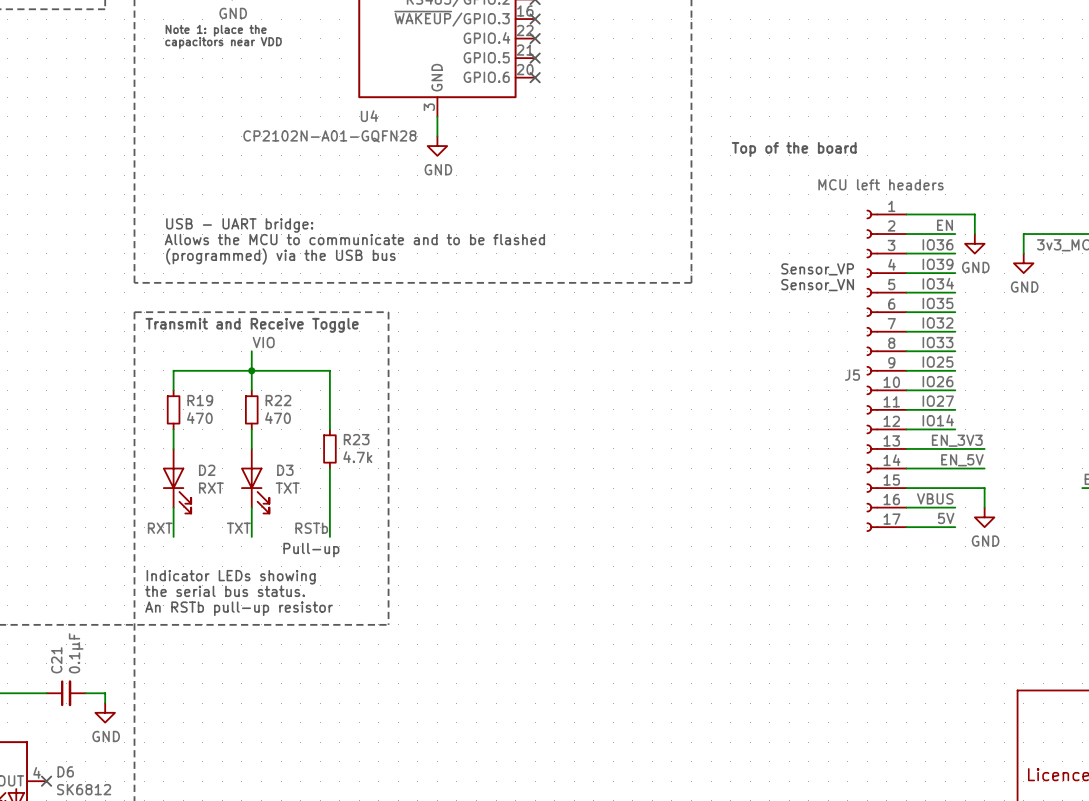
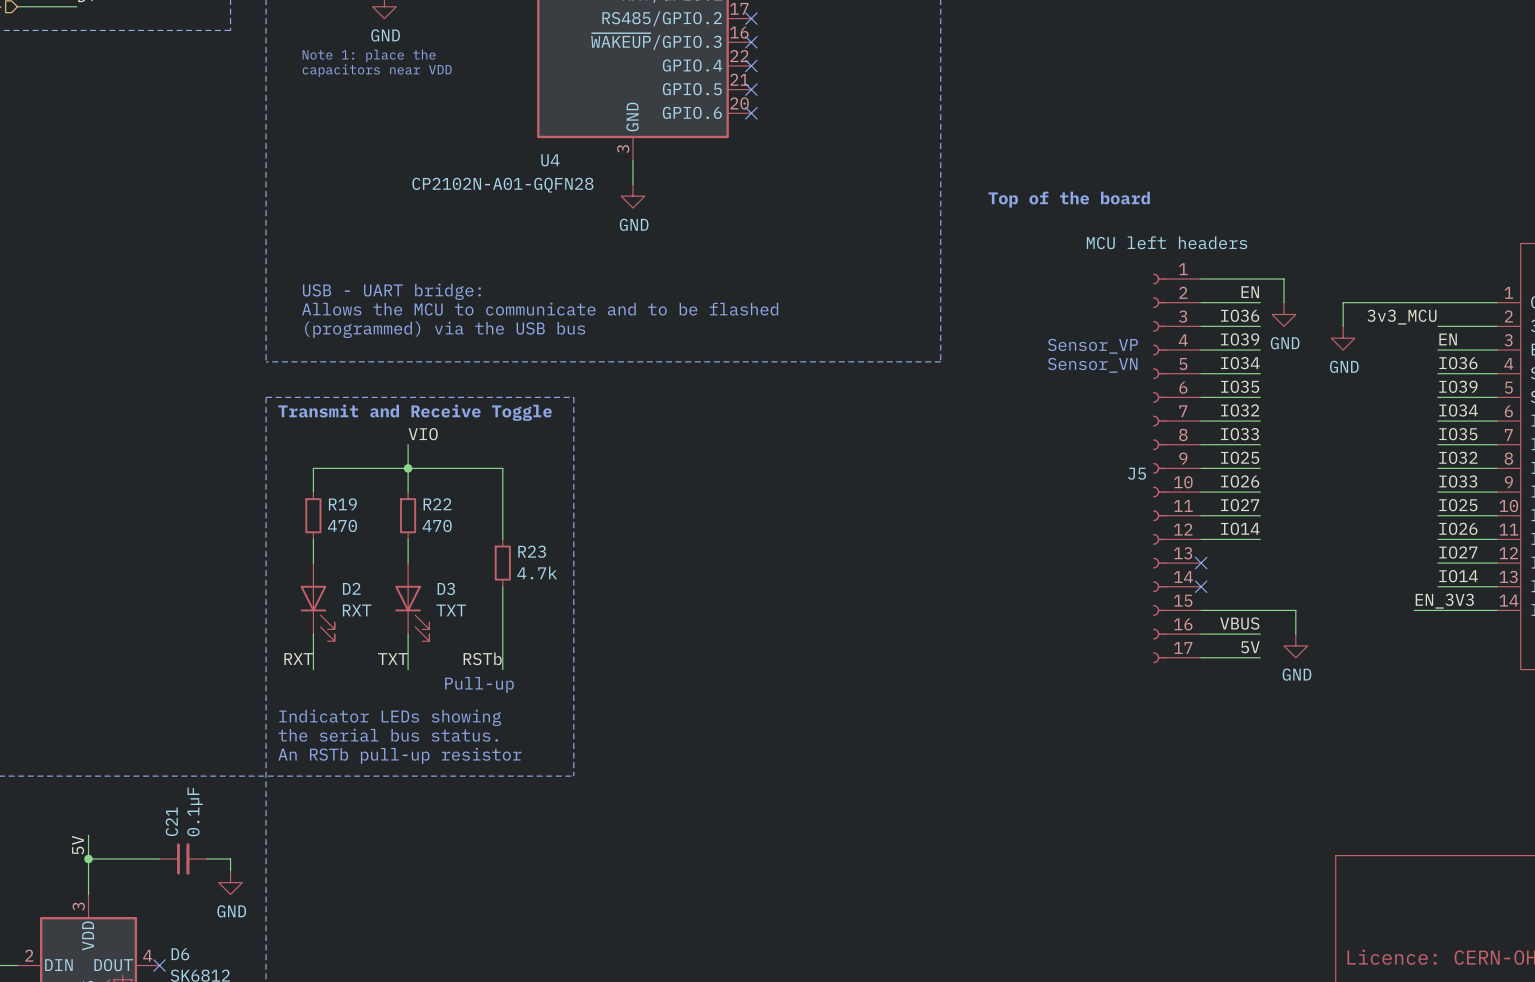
label: EN_3V3 (957, 440) -> none
wire: (906, 448) (984, 448) -> none
no-connect mark: none -> (1201, 563)
label: EN_5V (962, 460) -> none
wire: (906, 468) (984, 468) -> none
no-connect mark: none -> (1201, 586)

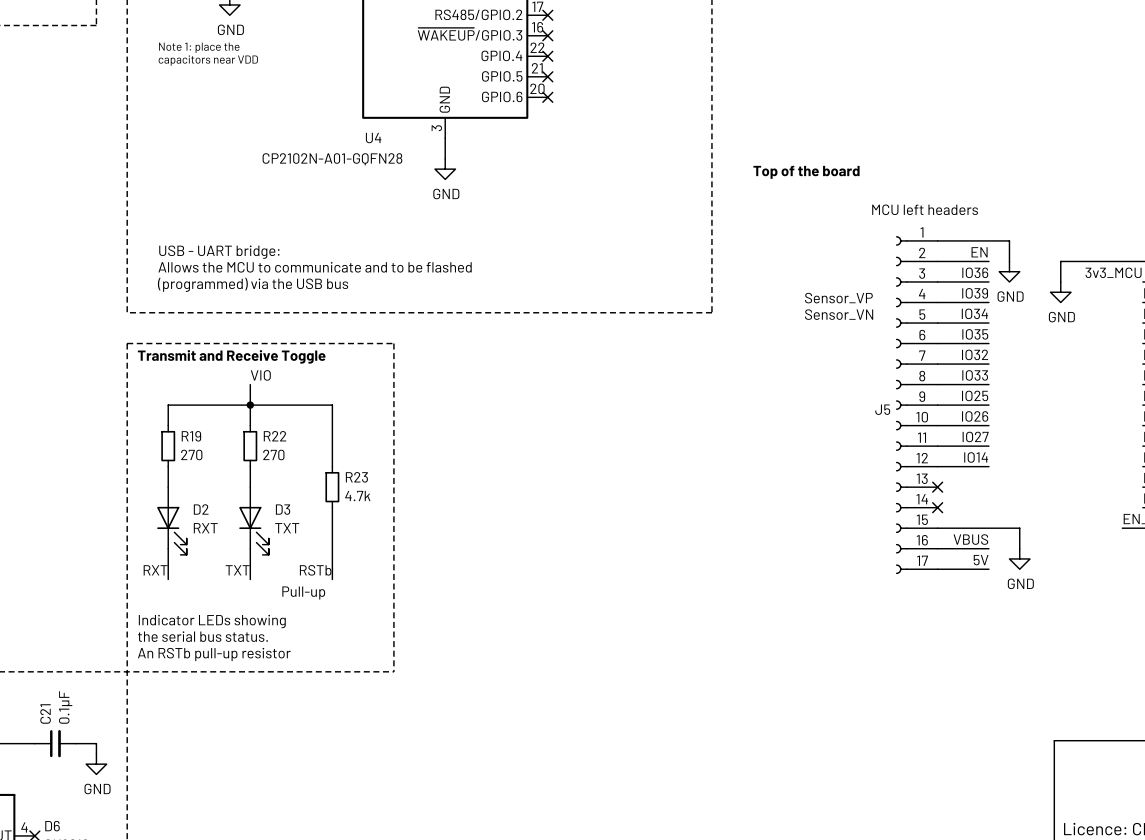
R19 value: 470 (342, 525) -> 270 (191, 454)
R22 value: 470 (437, 525) -> 270 (273, 454)

